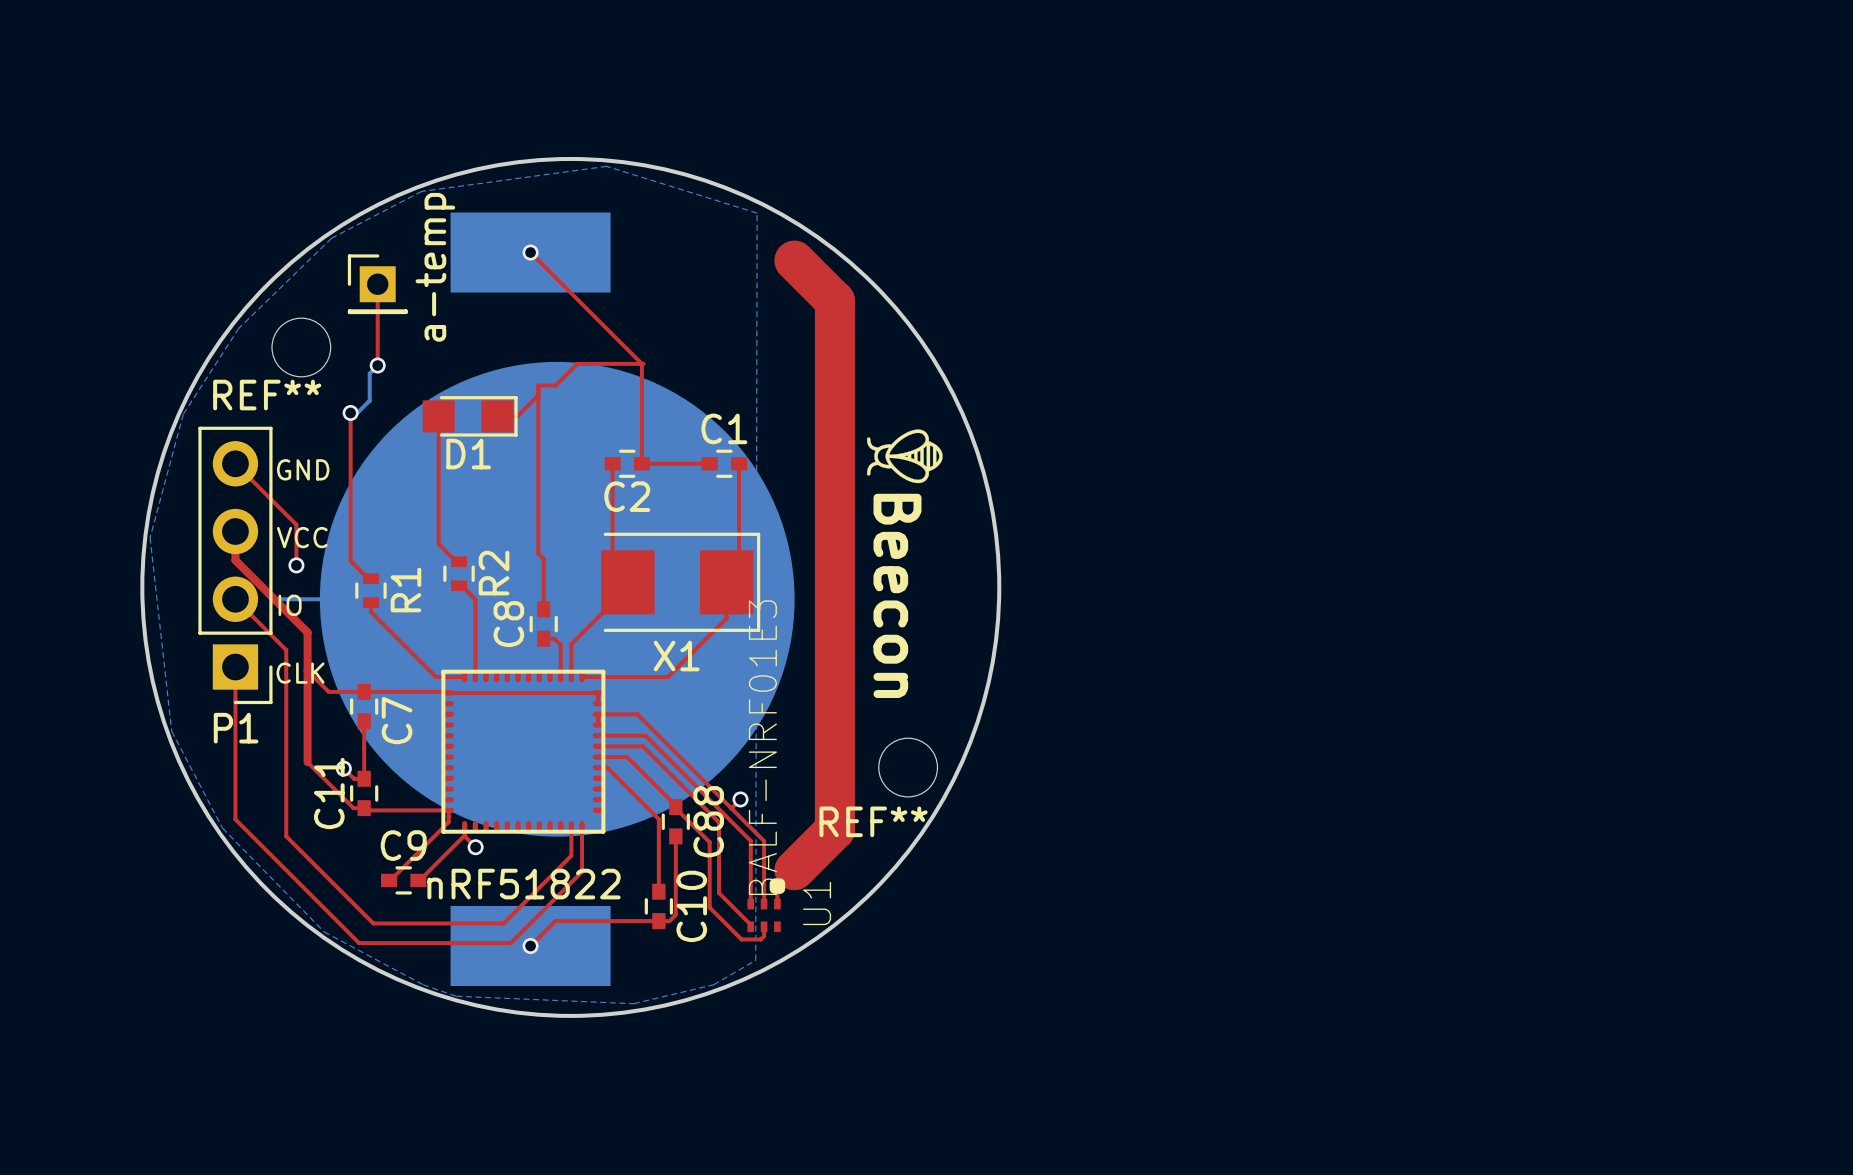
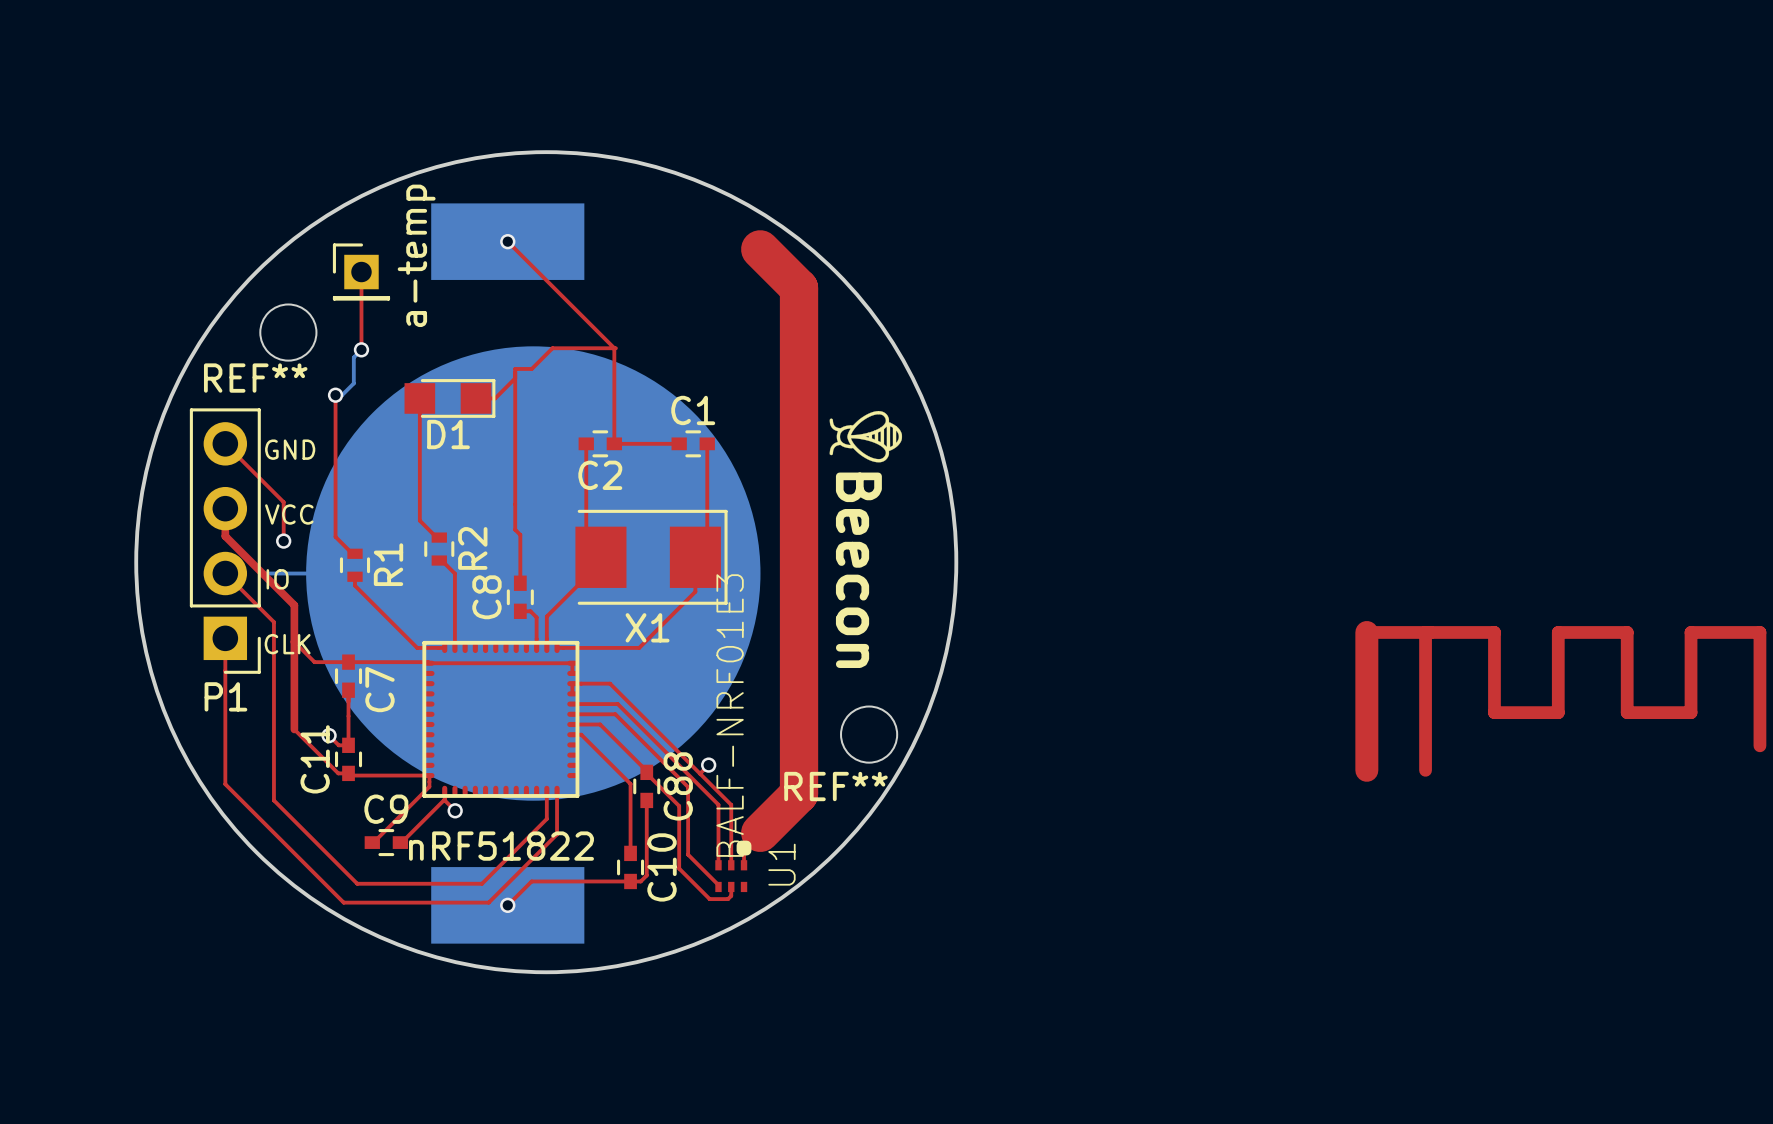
bottom zone outline: (606, 166) (757, 213) (755, 960) (713, 984) (633, 1003) (456, 996) (423, 984) (324, 931) (222, 828) (171, 731) (150, 537) (183, 414) (238, 328) (331, 238) (421, 191) (606, 166) -> none
top track: none -> (1425, 632) (1425, 770)
top track: none -> (1759, 745) (1759, 632) (1691, 632) (1691, 712) (1627, 712) (1627, 632) (1558, 632) (1558, 712) (1494, 712) (1494, 632) (1366, 632) (1366, 770)

